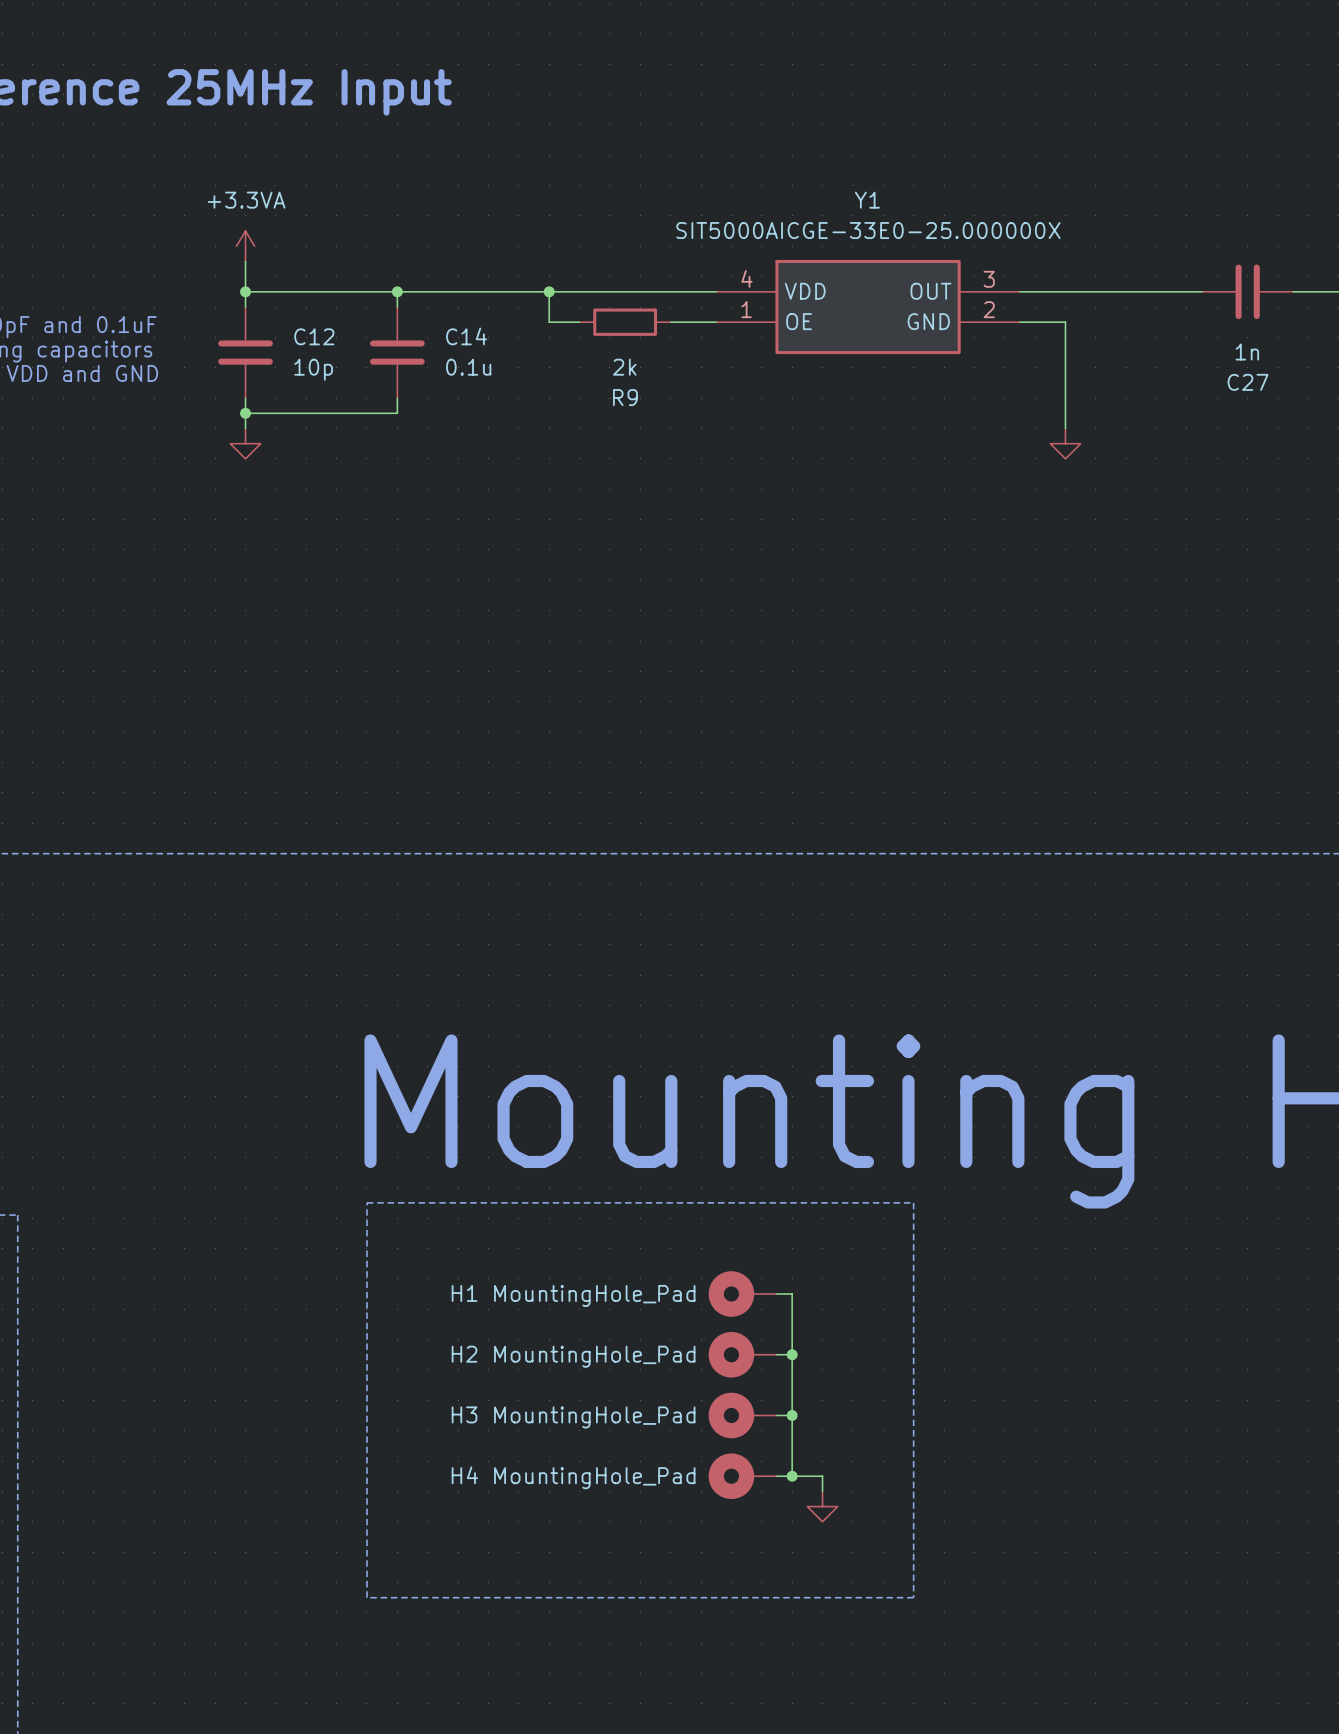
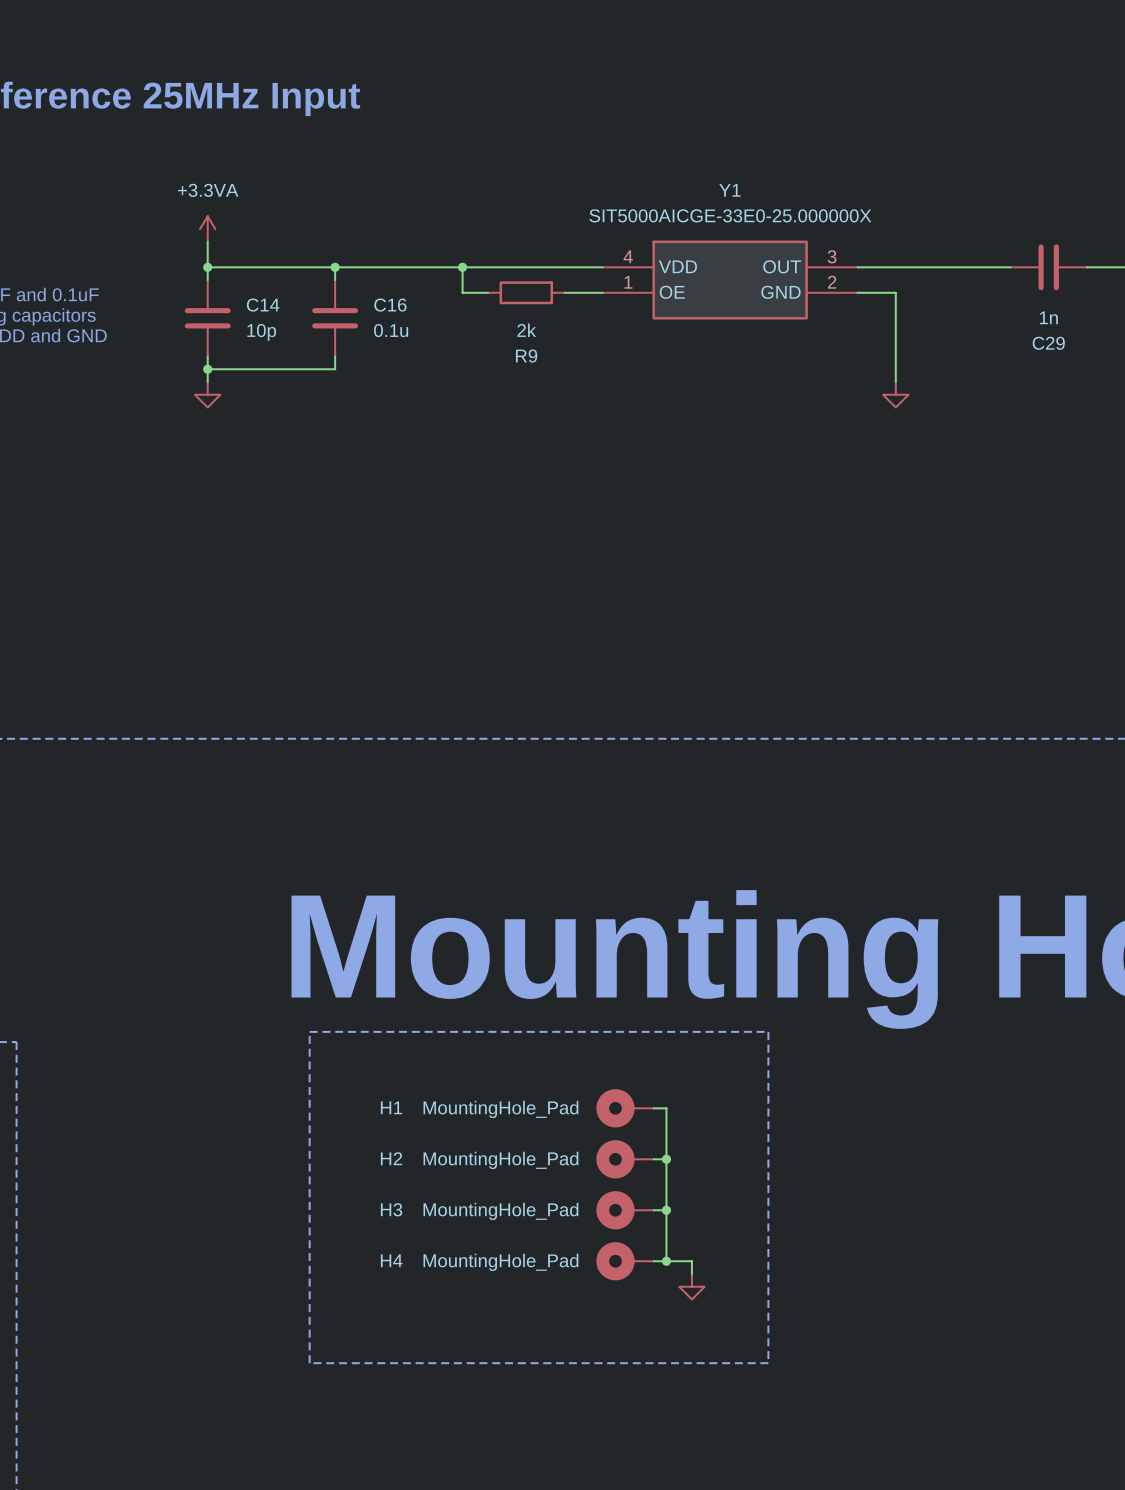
C12 name: C12 (314, 336) -> C14 (263, 305)
C14 name: C14 (466, 336) -> C16 (390, 305)
C27 name: C27 (1248, 382) -> C29 (1048, 343)

